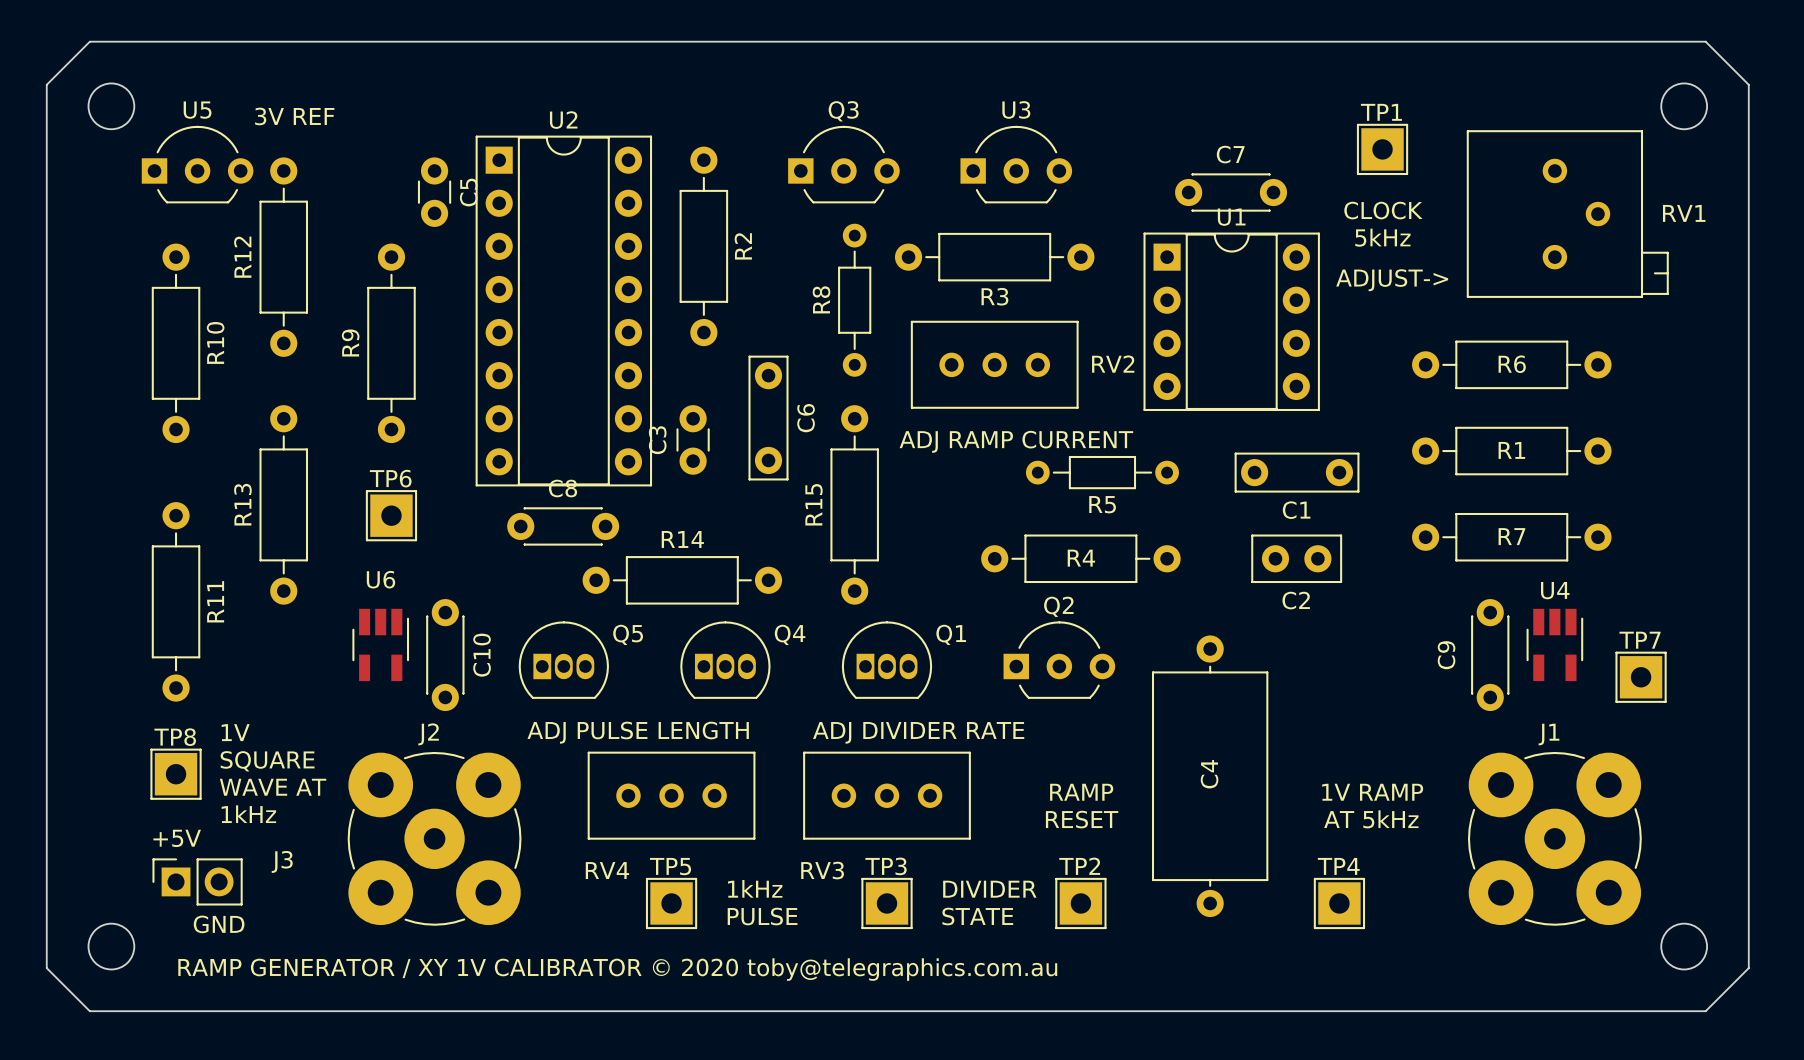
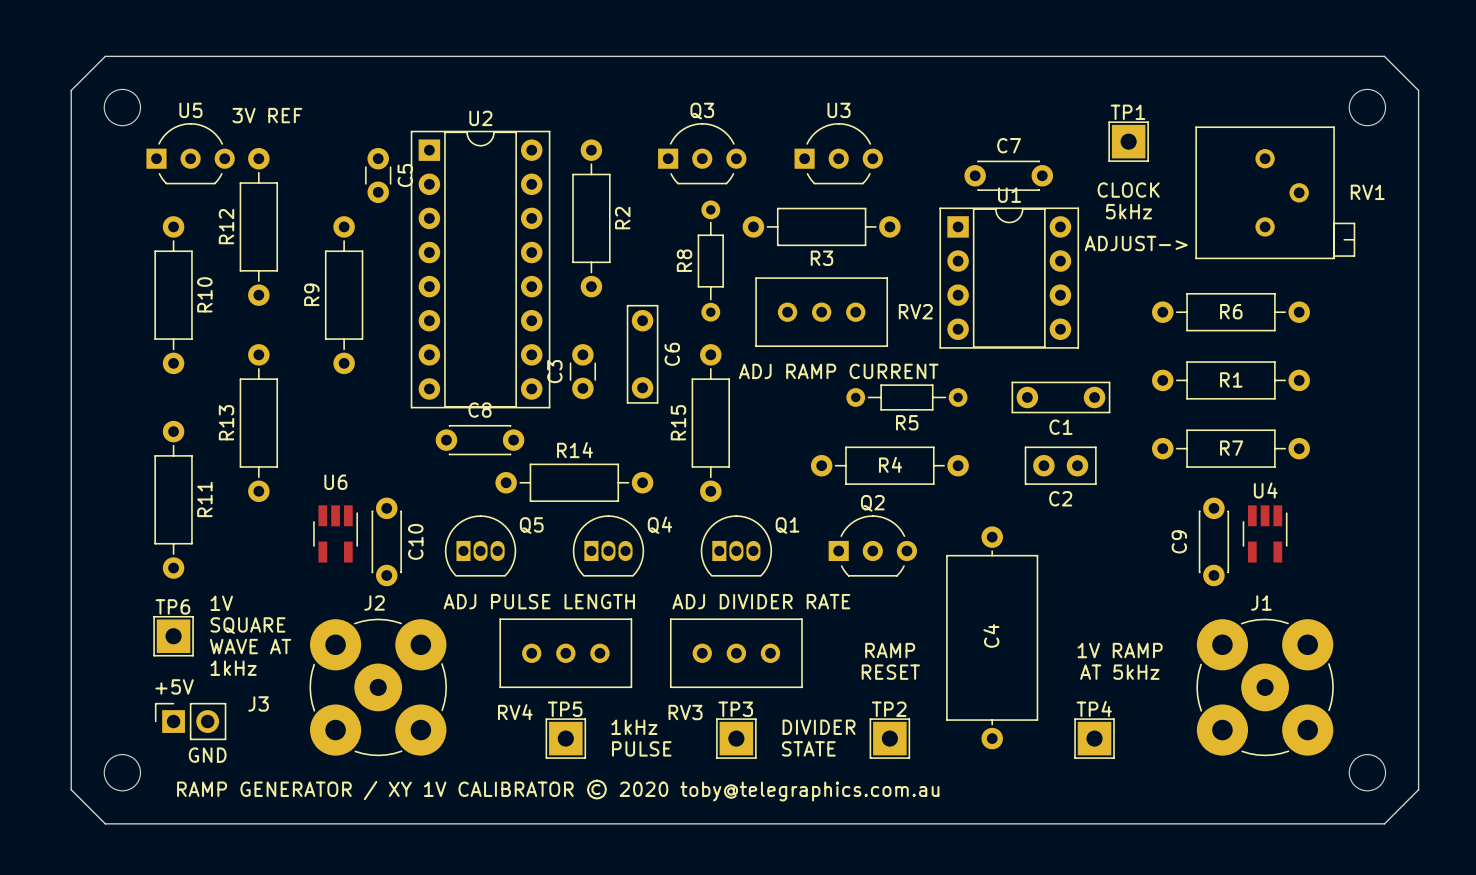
TP6: (391, 515) -> none
TP7: (1641, 677) -> none
TP8 name: TP8 (175, 737) -> TP6 (172, 606)

